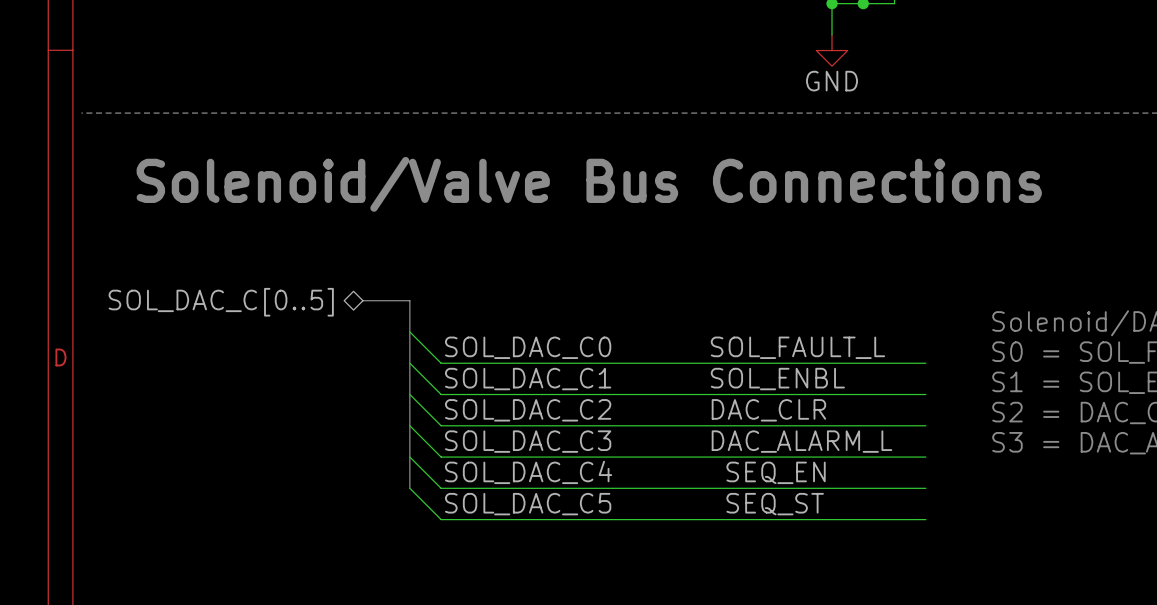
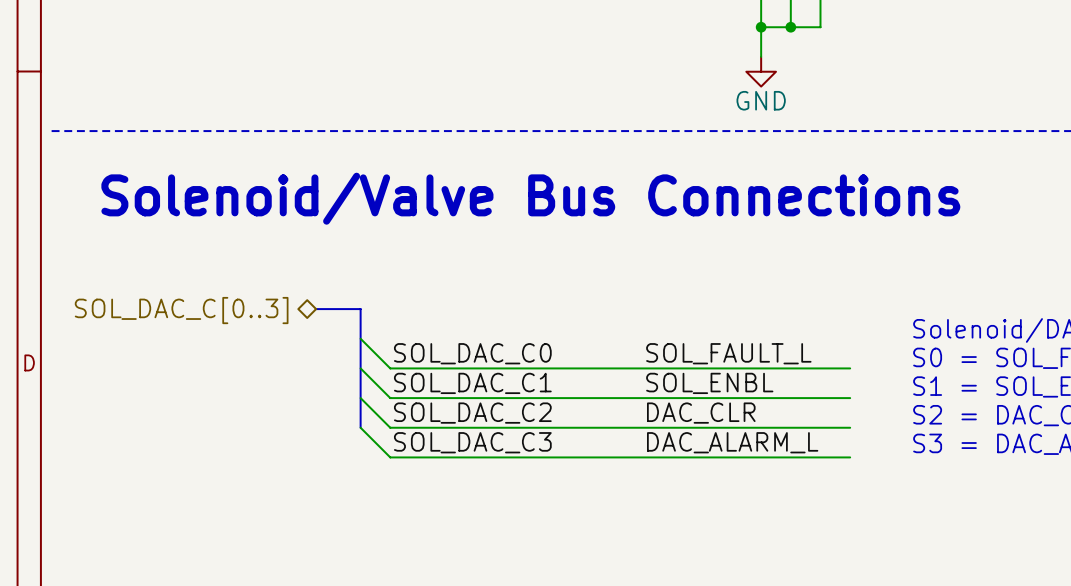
hierarchical label: SOL_DAC_C[0..5] (221, 302) -> SOL_DAC_C[0..3] (181, 310)
bus: (409, 425) (409, 488) -> none
wire: (409, 457) (441, 488) (925, 488) -> none
label: SOL_DAC_C4 (528, 472) -> none
label: SEQ_EN (776, 472) -> none
wire: (409, 488) (441, 519) (925, 519) -> none
label: SOL_DAC_C5 (528, 504) -> none
label: SEQ_ST (775, 504) -> none

